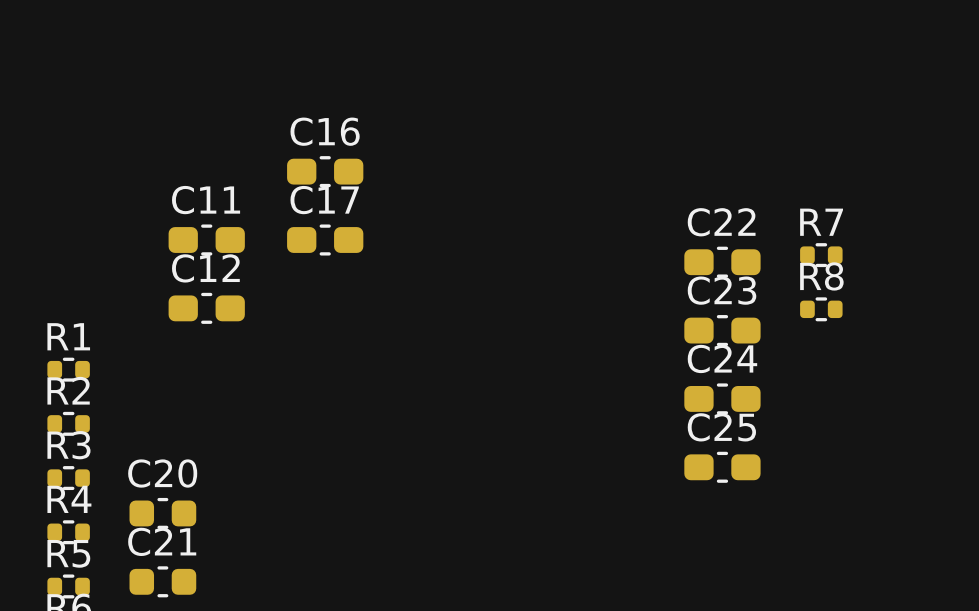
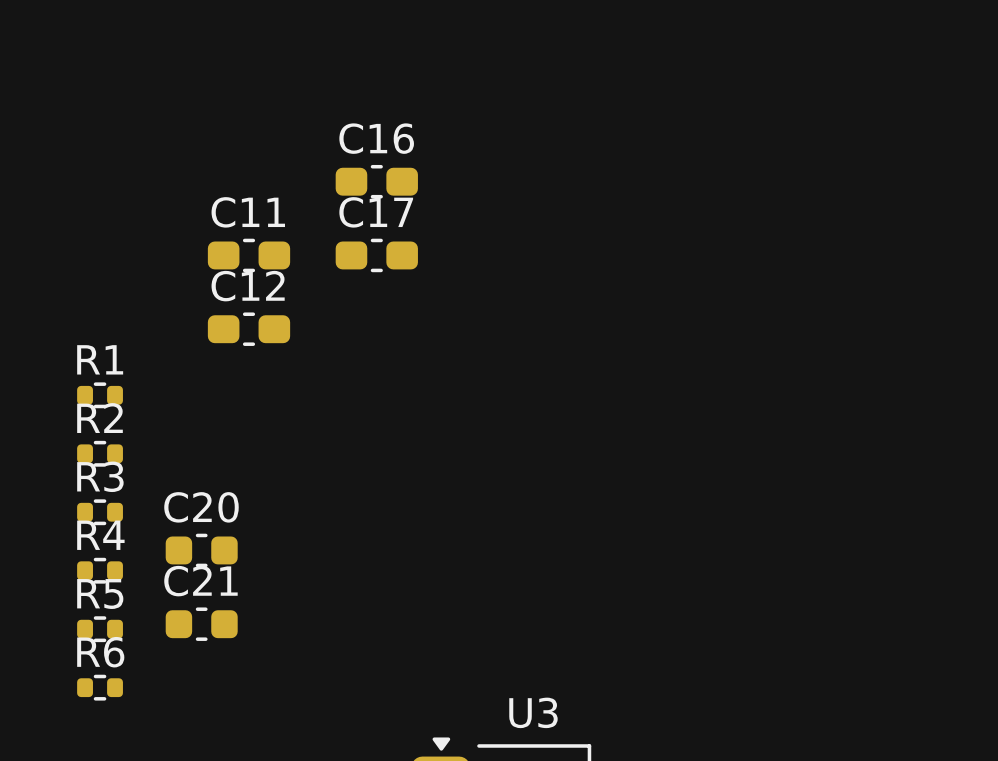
R7: (821, 255) -> none
C22: (722, 262) -> none
R8: (821, 309) -> none
C23: (722, 330) -> none
C24: (722, 398) -> none
C25: (722, 467) -> none

